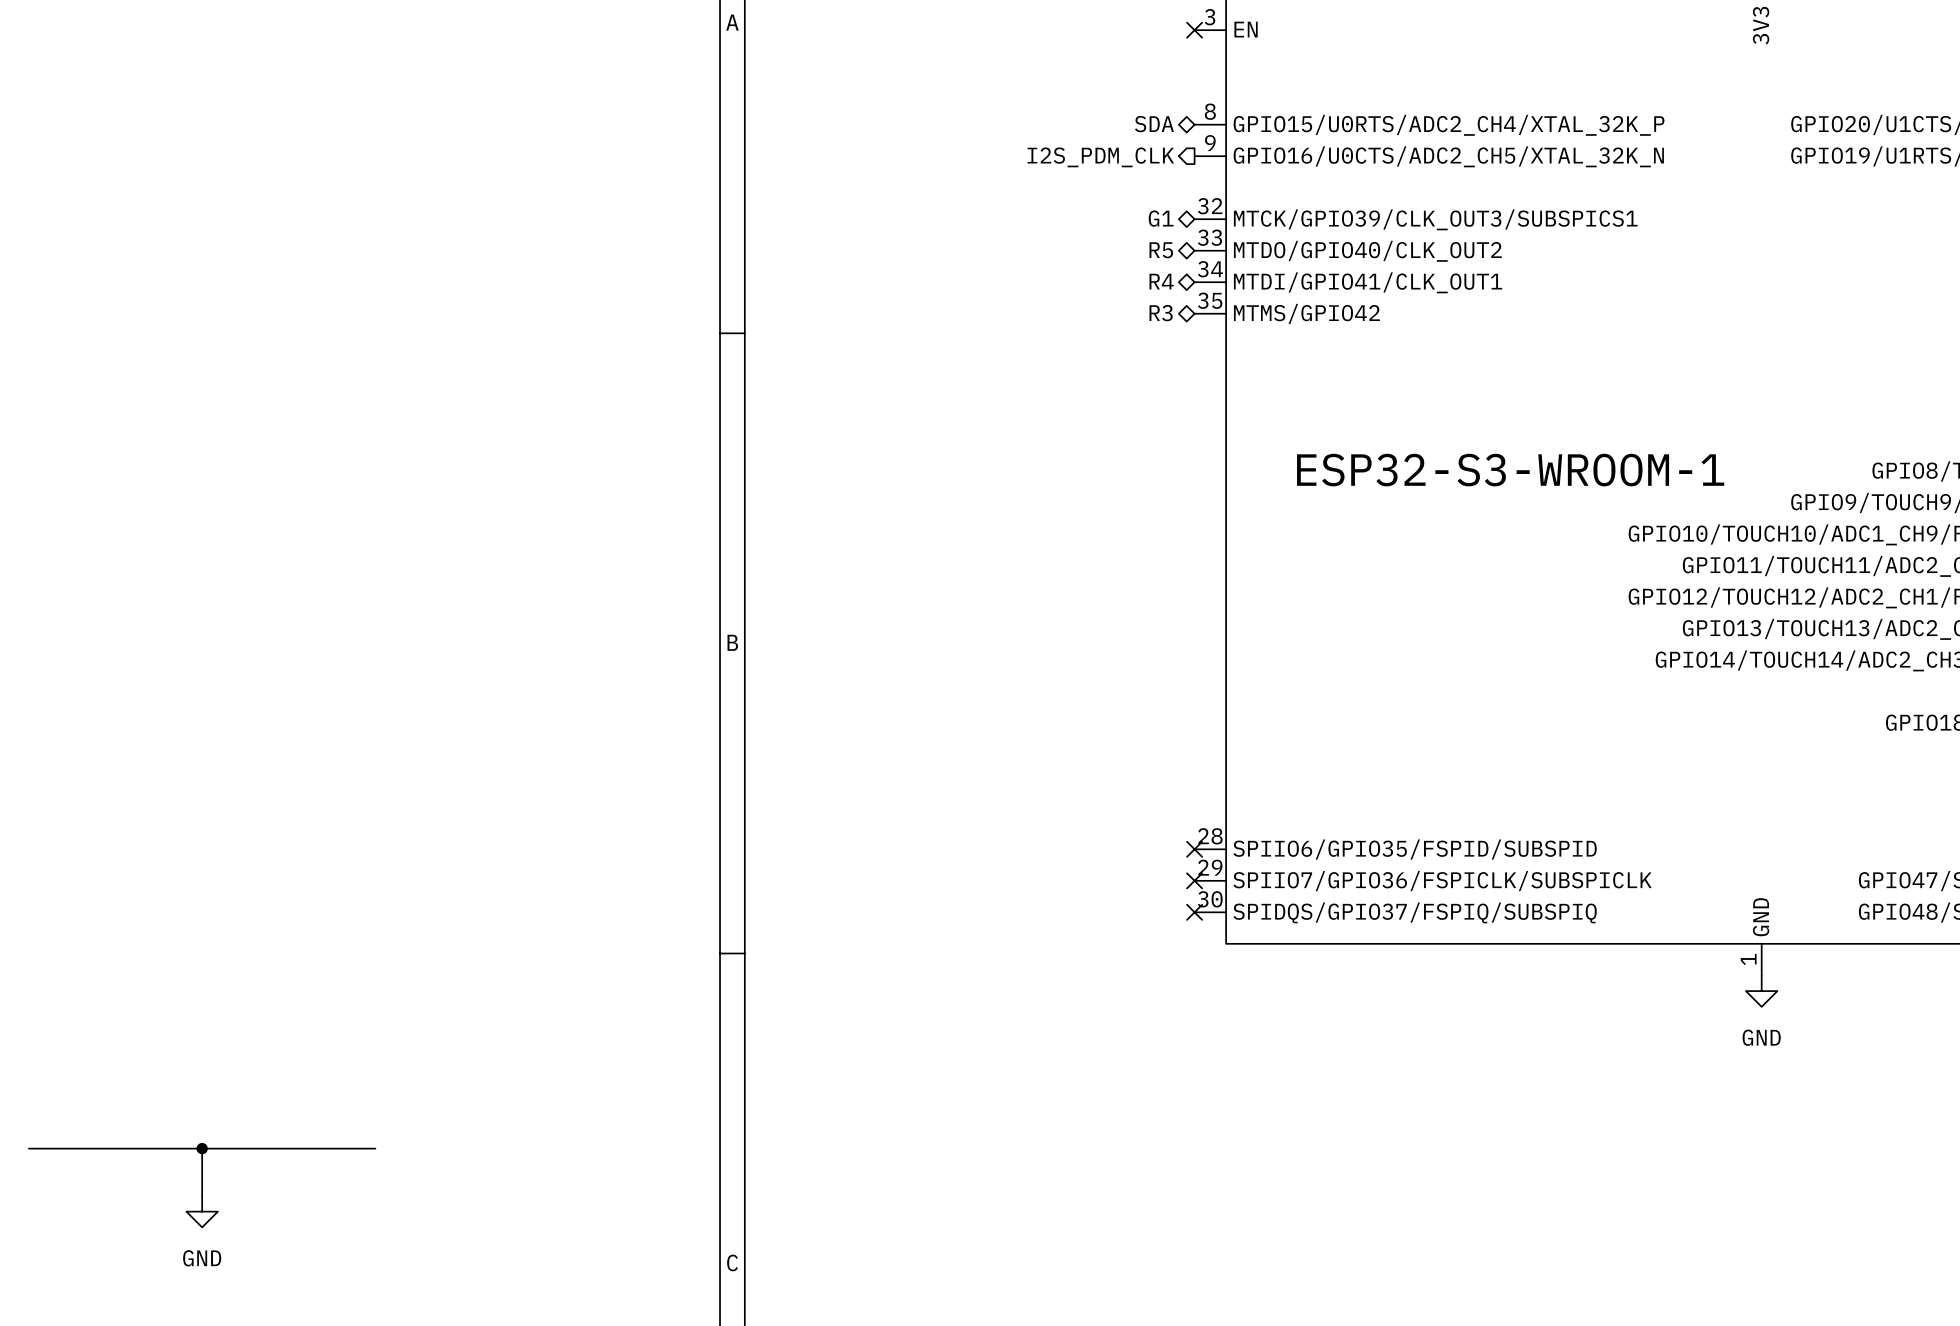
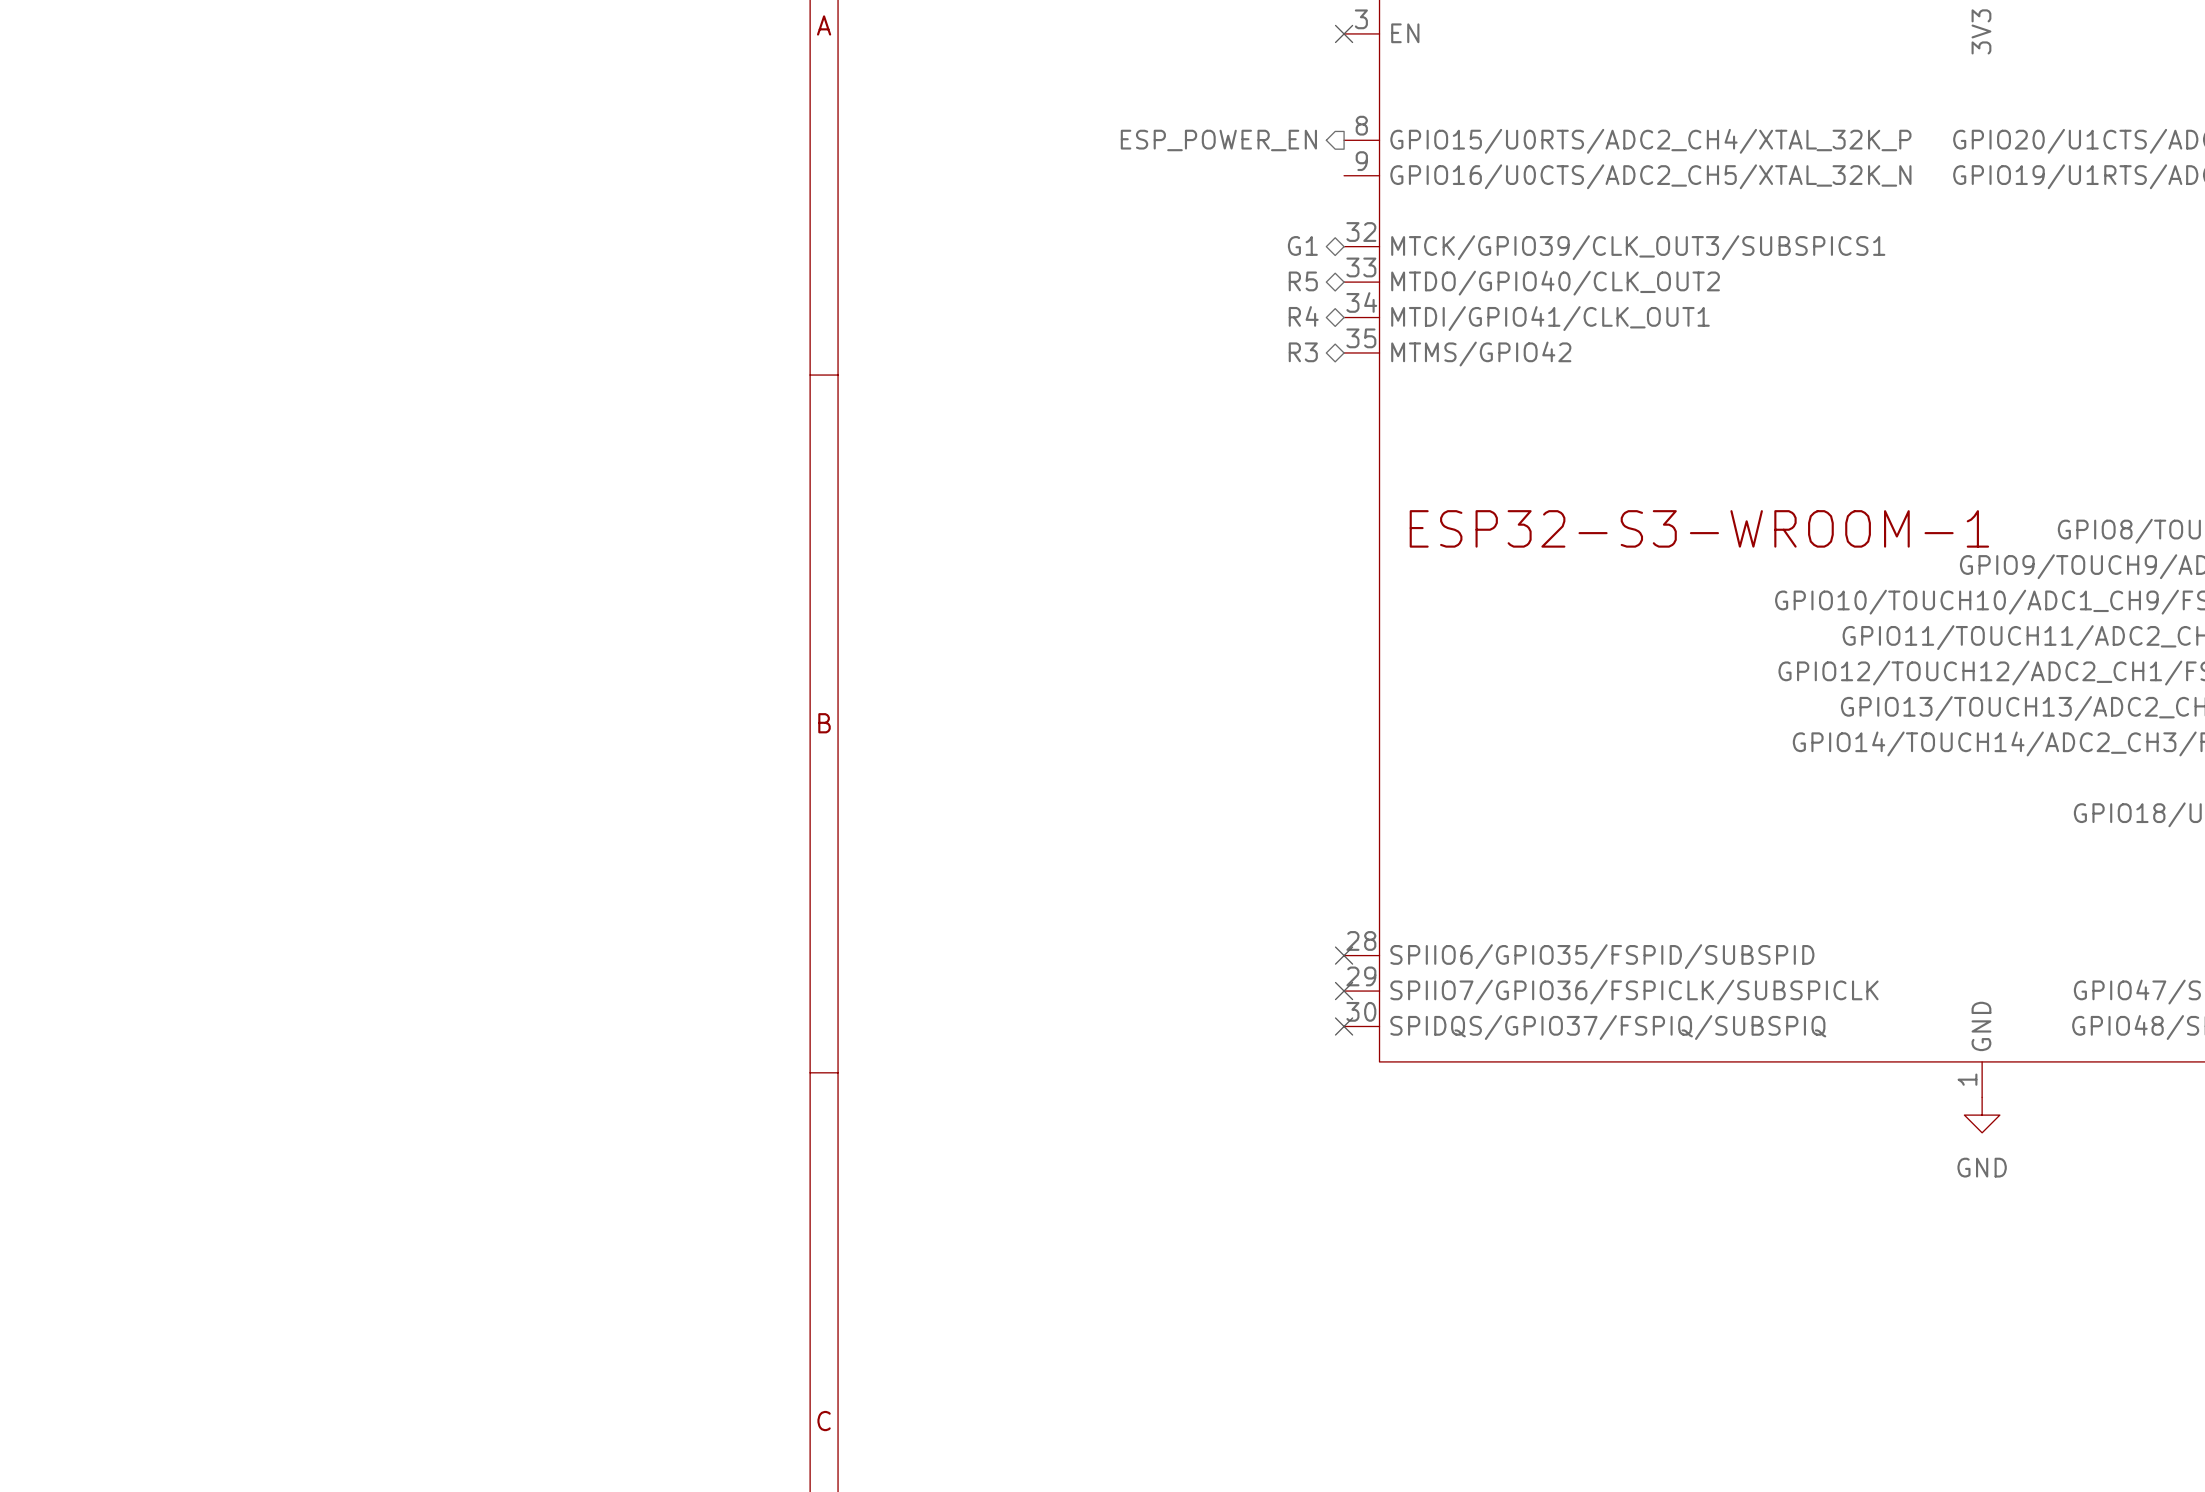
hierarchical label shape: bidirectional (1154, 124) -> output (1218, 140)
hierarchical label: SDA (1154, 124) -> ESP_POWER_EN (1218, 140)
hierarchical label: I2S_PDM_CLK (1100, 157) -> none
wire: (28, 1148) (375, 1148) -> none
wire: (202, 1148) (202, 1195) -> none
junction: (202, 1148) -> none
power symbol: GND (202, 1211) -> none

